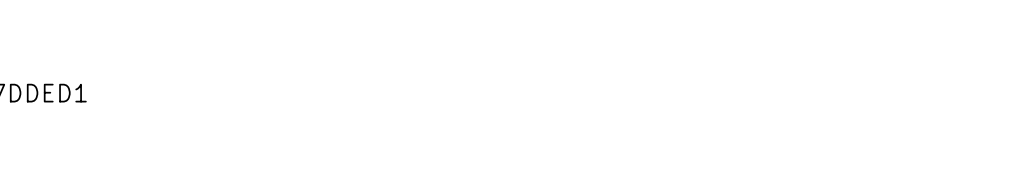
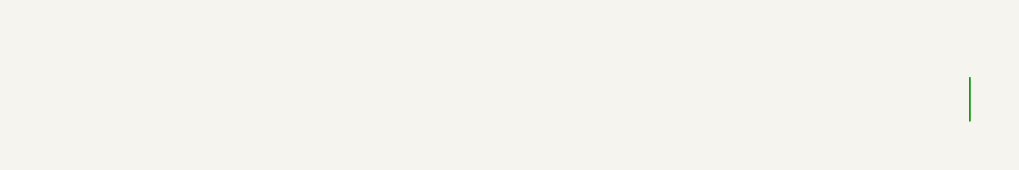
wire: none -> (969, 77) (969, 120)

